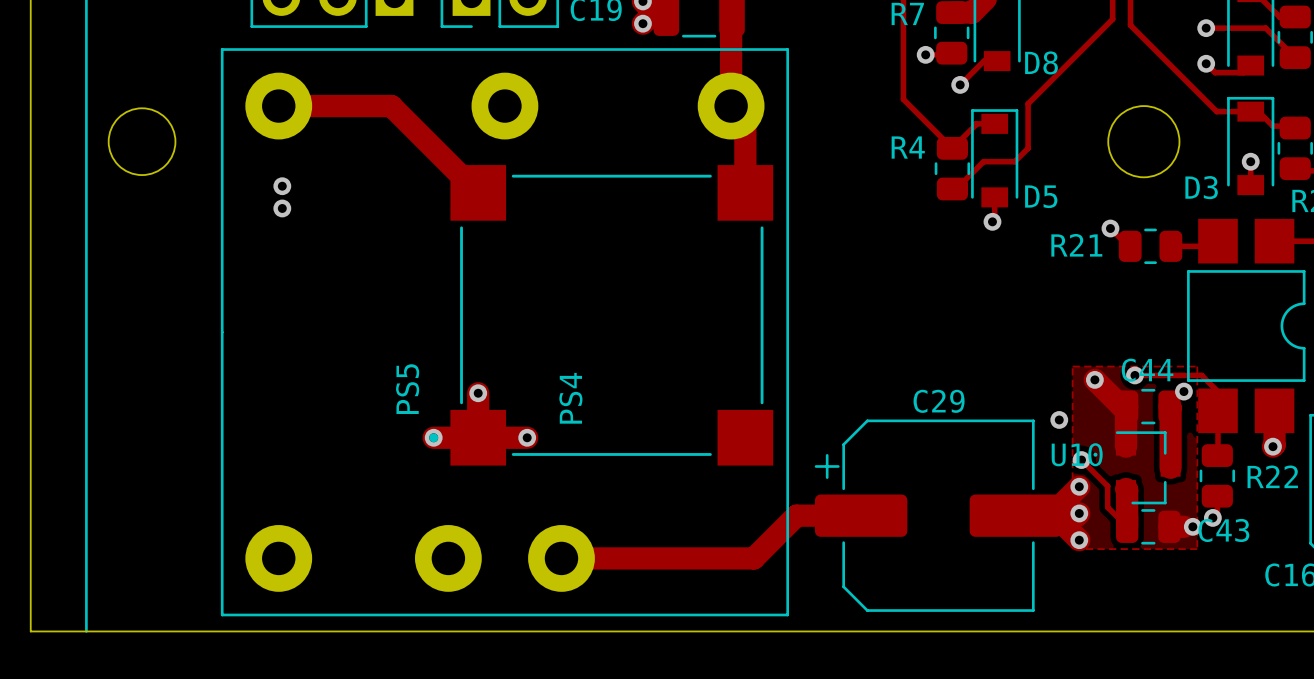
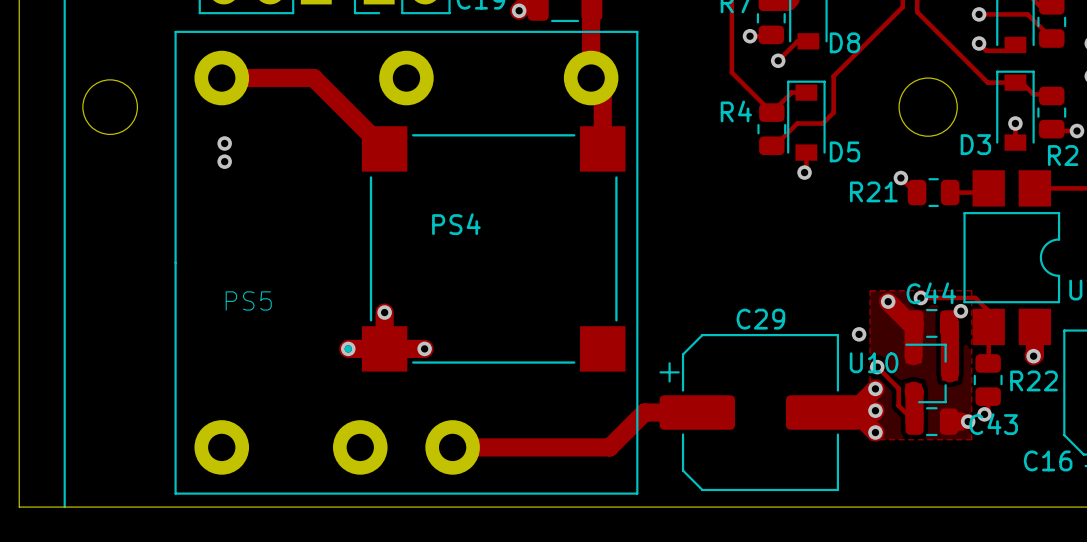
PS5 name rotation: 0° (407, 389) -> 90° clockwise (248, 300)
PS5 name position: PS5 (407, 389) -> PS5 (248, 300)
PS4 name rotation: 0° (570, 398) -> 90° clockwise (456, 224)
PS4 name position: PS4 (570, 398) -> PS4 (456, 224)

